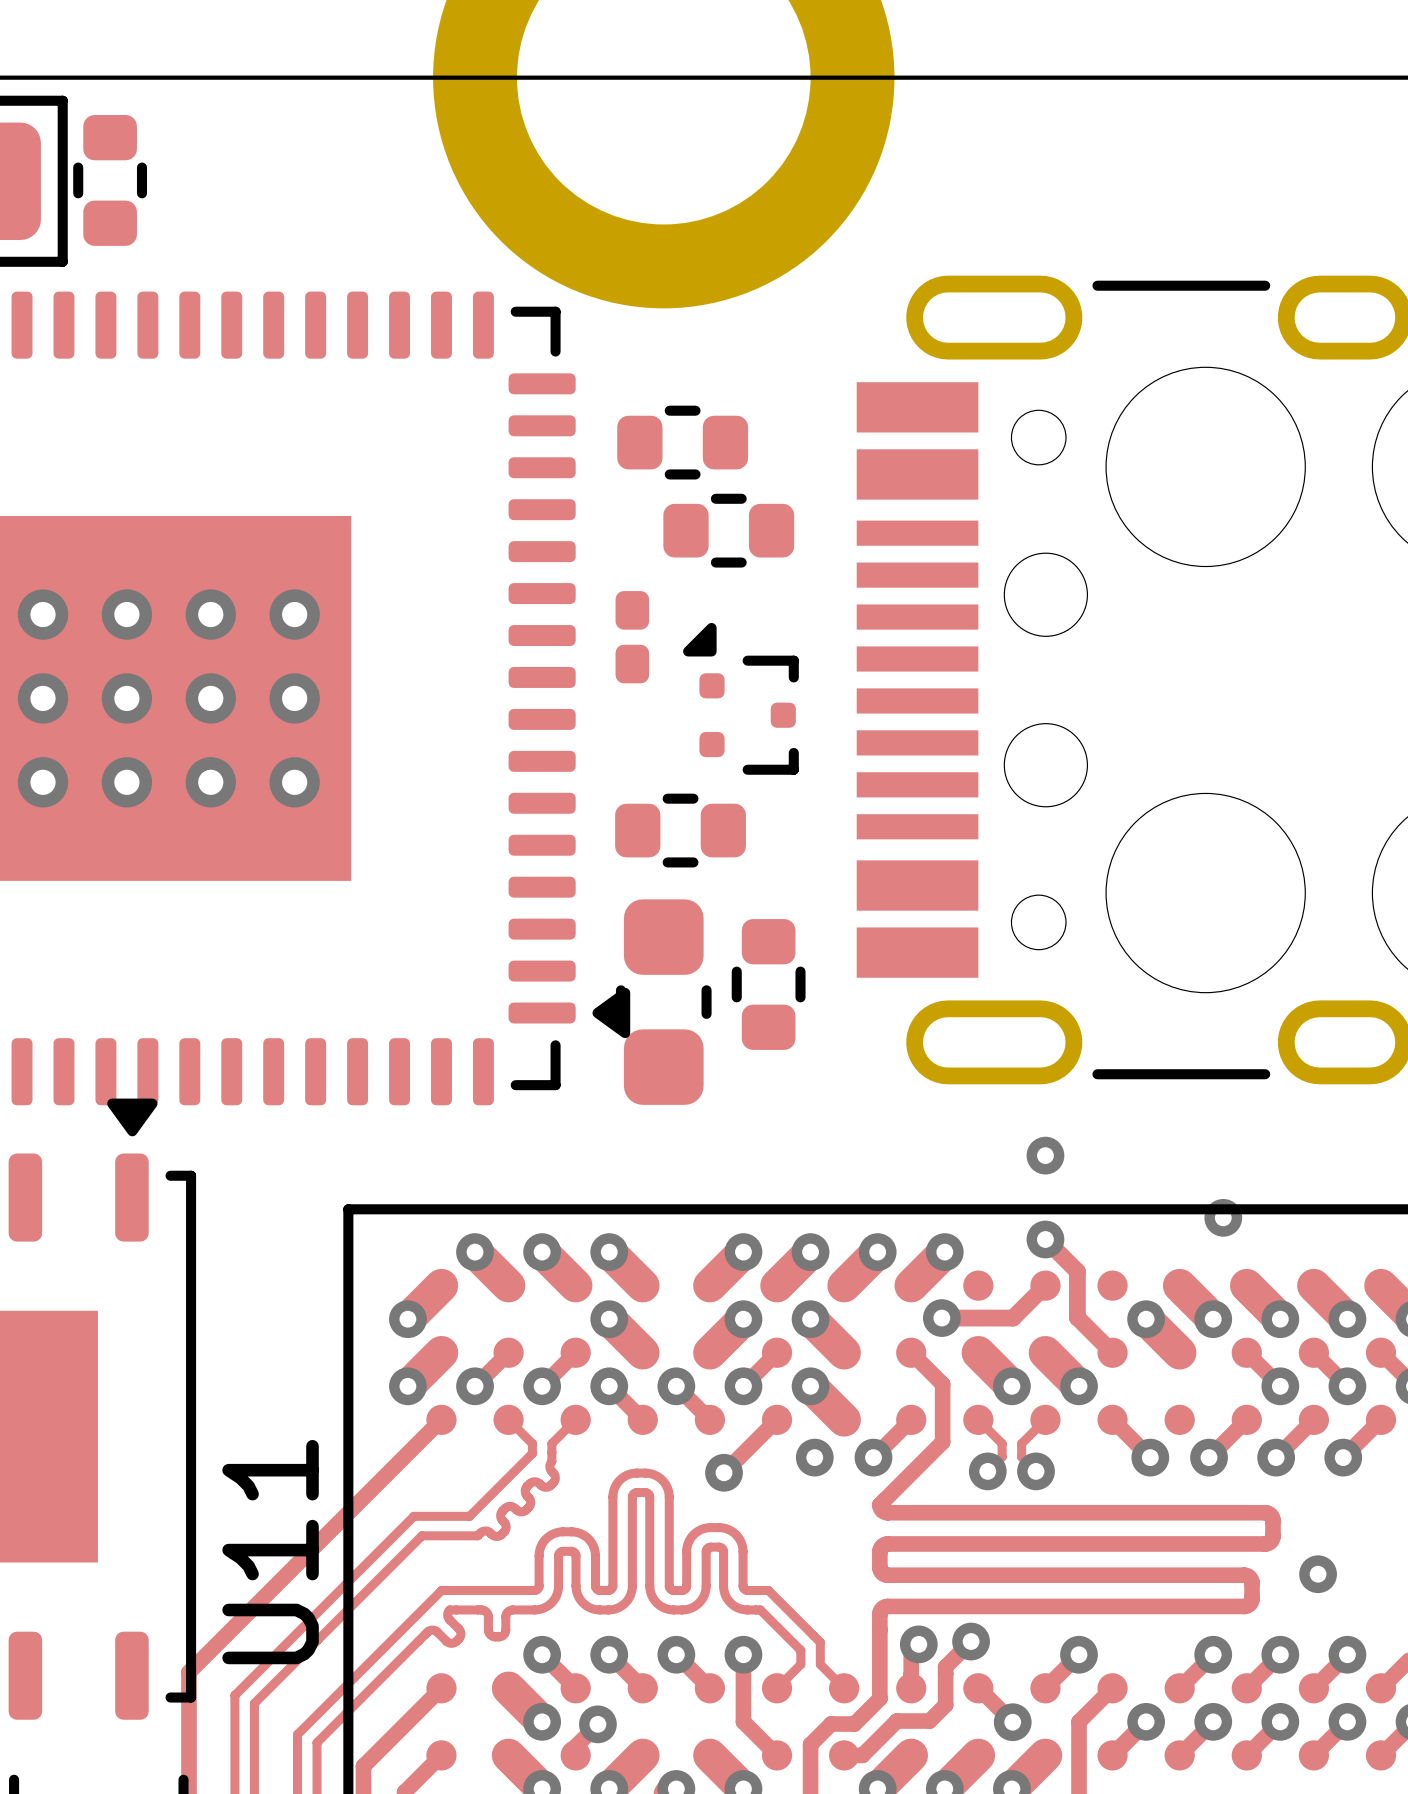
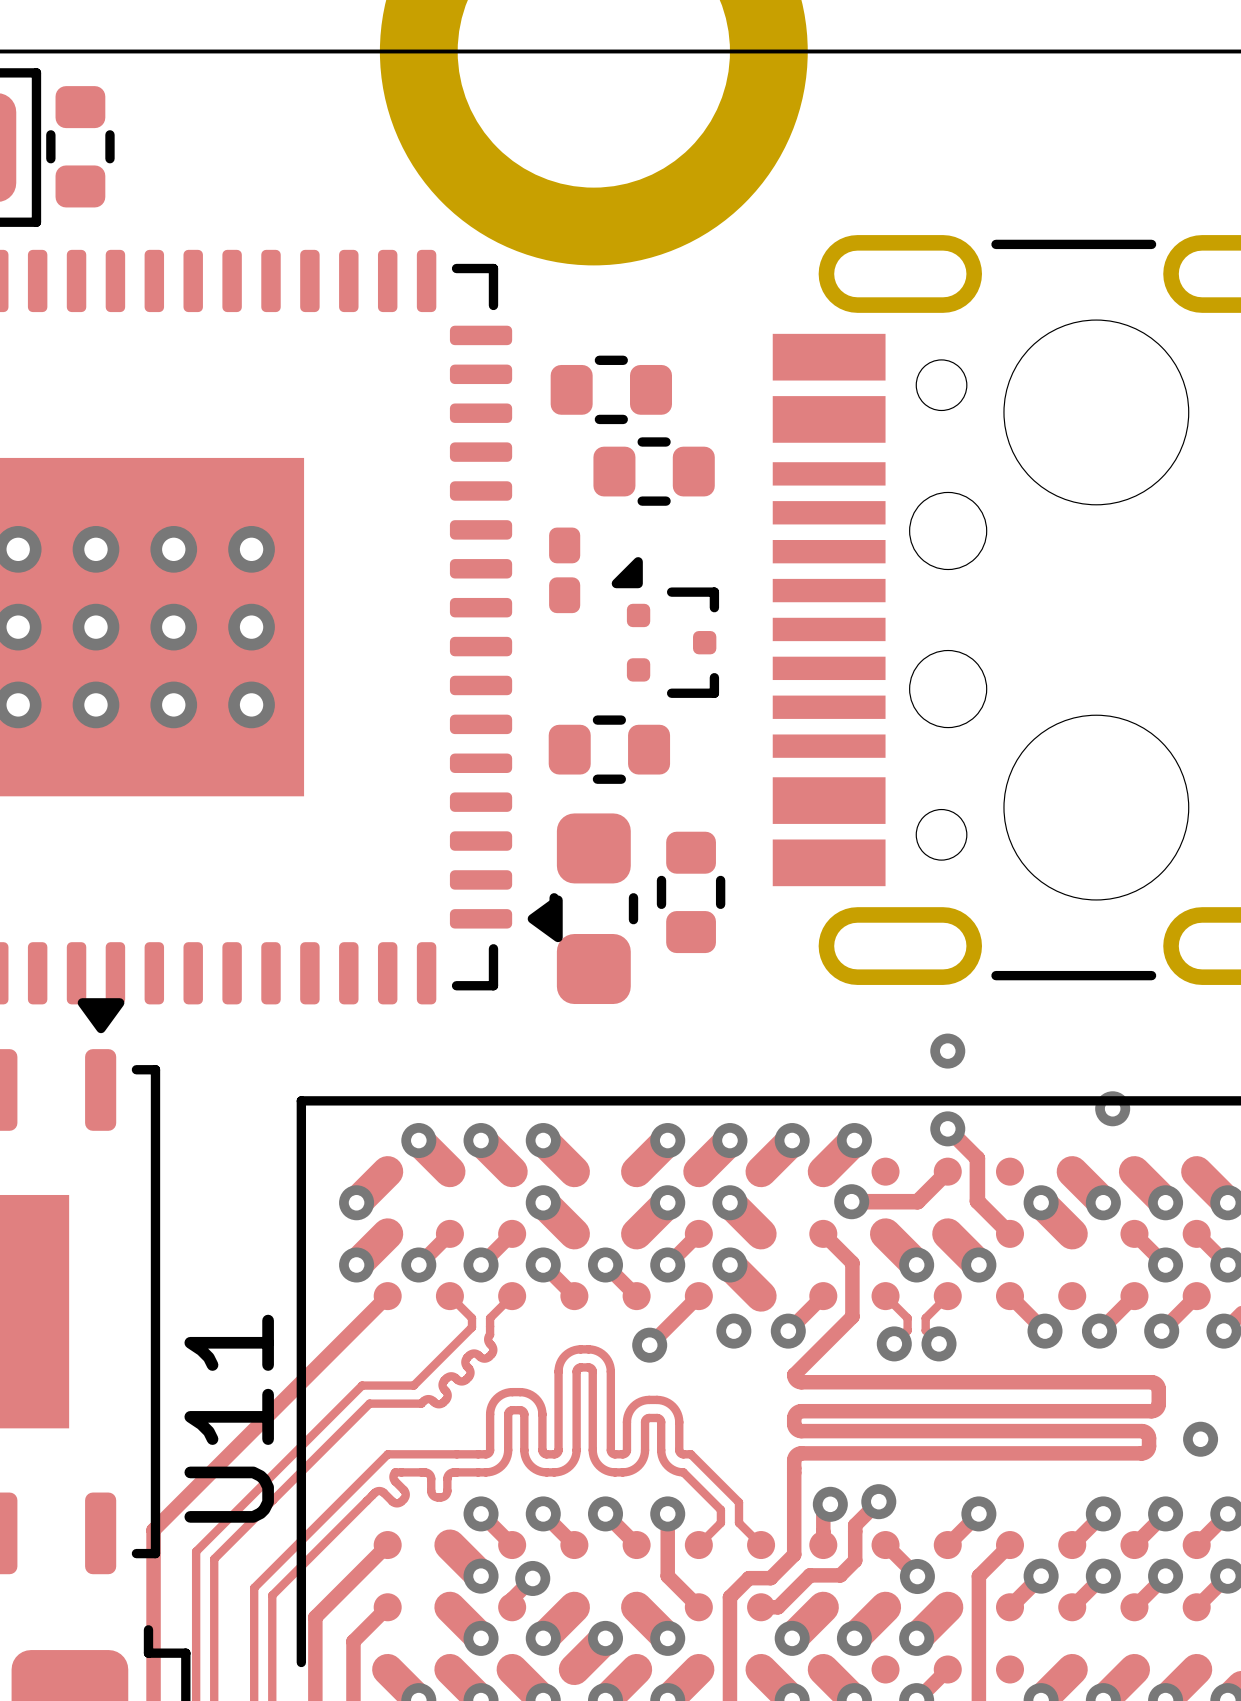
track: (879, 1557) (880, 1569) (886, 1575) (1244, 1575) (1249, 1577) (1252, 1583) (1251, 1601) (1245, 1606) (887, 1606) (882, 1608) (879, 1614) -> (794, 1423) (796, 1428) (801, 1431) (1141, 1431) (1146, 1433) (1149, 1438) (1148, 1449) (1141, 1453) (800, 1453) (794, 1459) (794, 1476)
track: (534, 1590) (539, 1586) (540, 1546) (551, 1535) (563, 1531) (580, 1533) (590, 1541) (595, 1552) (595, 1587) (599, 1590) (611, 1588) (613, 1490) (622, 1478) (636, 1473) (648, 1473) (657, 1476) (664, 1482) (668, 1490) (670, 1589) (682, 1590) (686, 1587) (686, 1548) (691, 1537) (701, 1529) (719, 1527) (731, 1530) (741, 1542) (743, 1588) (747, 1590) (760, 1590) -> (474, 1454) (486, 1454) (489, 1452) (491, 1405) (498, 1396) (512, 1392) (528, 1393) (537, 1400) (542, 1411) (542, 1451) (546, 1454) (557, 1453) (559, 1365) (567, 1353) (580, 1349) (599, 1352) (606, 1358) (610, 1365) (612, 1453) (623, 1454) (626, 1451) (627, 1419) (631, 1408) (640, 1401) (657, 1399) (668, 1402) (677, 1413) (679, 1450) (683, 1454)
track: (534, 1609) (549, 1605) (556, 1595) (558, 1555) (562, 1551) (572, 1551) (575, 1553) (576, 1589) (579, 1597) (585, 1605) (596, 1609) (611, 1609) (620, 1606) (627, 1600) (632, 1585) (632, 1496) (636, 1492) (646, 1492) (649, 1496) (649, 1589) (656, 1602) (667, 1609) (682, 1609) (691, 1608) (699, 1602) (705, 1589) (706, 1550) (709, 1547) (719, 1547) (723, 1551) (723, 1589) (726, 1597) (738, 1608) (760, 1609) -> (474, 1472) (494, 1470) (505, 1461) (508, 1450) (508, 1413) (511, 1410) (521, 1410) (524, 1413) (524, 1453) (530, 1465) (538, 1470) (546, 1472) (560, 1471) (570, 1465) (576, 1453) (576, 1371) (580, 1367) (589, 1367) (592, 1370) (592, 1453) (599, 1465) (606, 1470) (615, 1472) (628, 1471) (636, 1467) (642, 1461) (644, 1453) (645, 1420) (648, 1418) (657, 1418) (661, 1421) (662, 1458) (672, 1469) (683, 1472)

